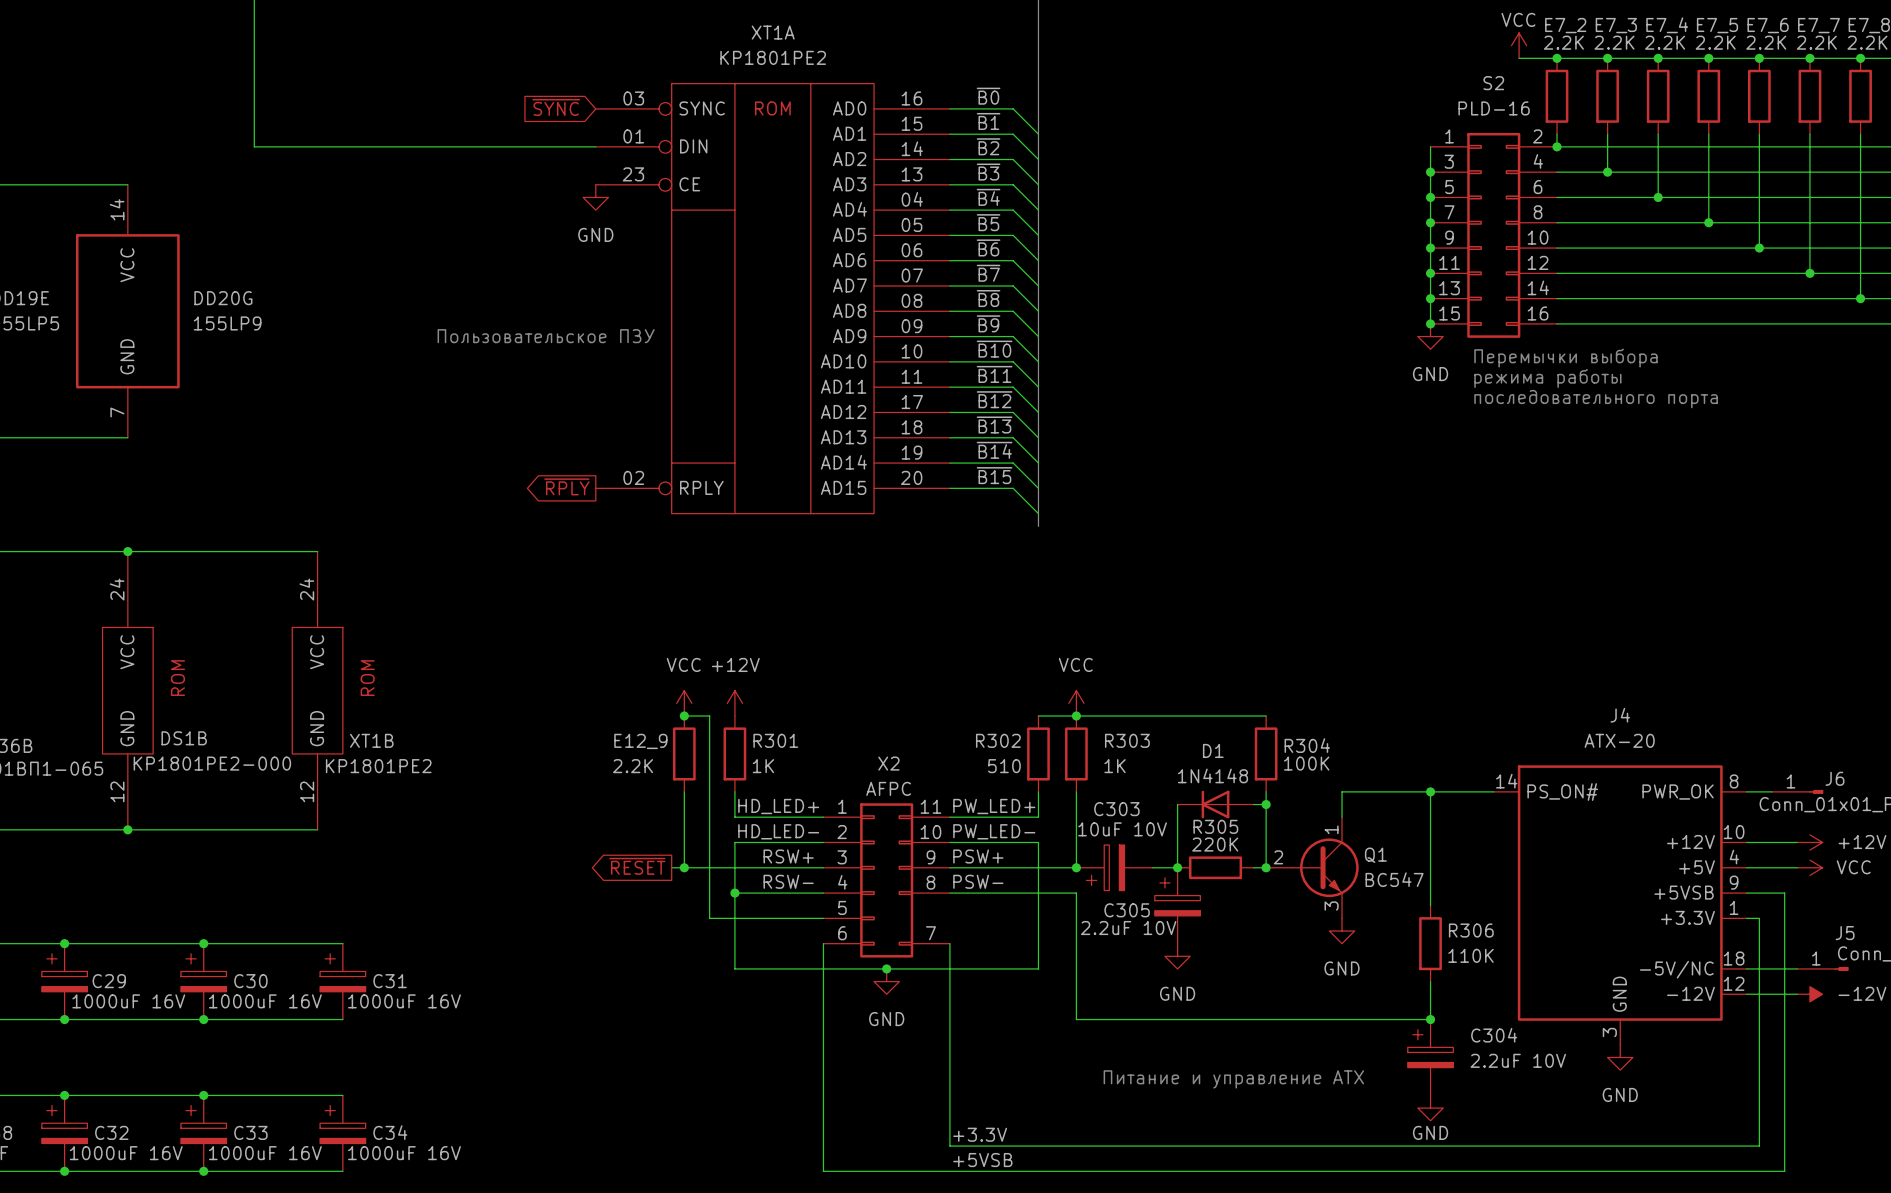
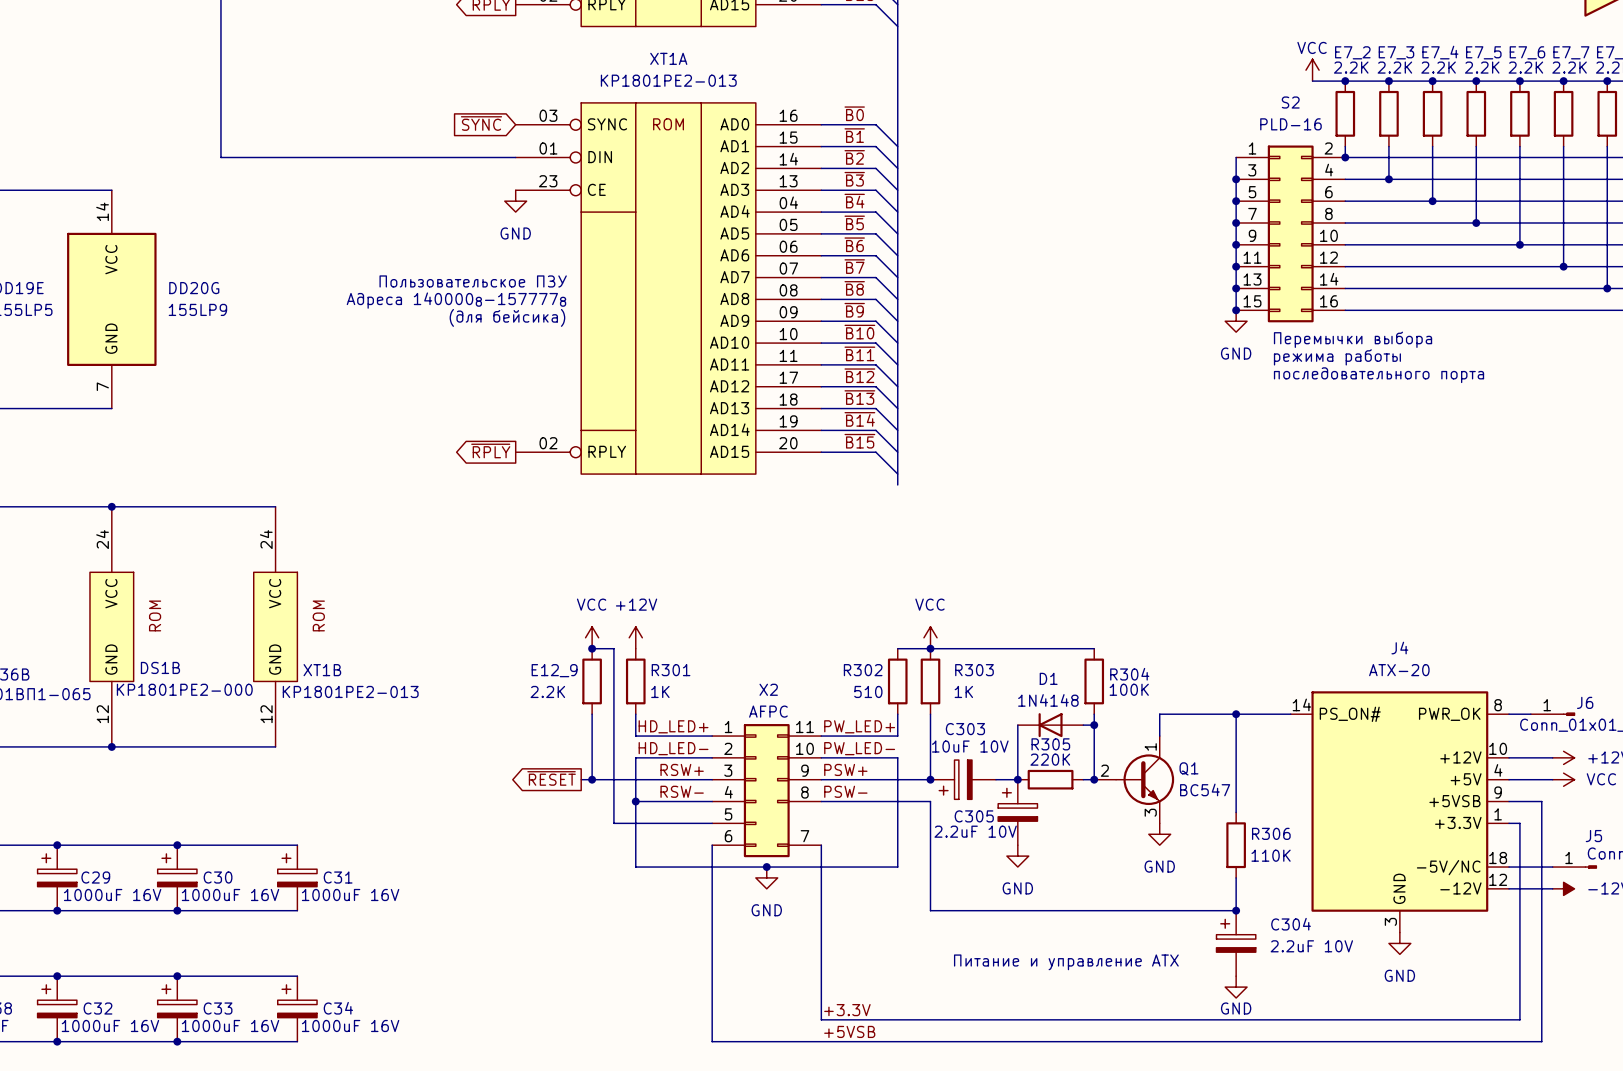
XT1A value: КР1801РЕ2 (773, 57) -> КР1801РЕ2-013 (668, 80)
text: none -> Адреса 1400008-1577778 (456, 300)
text: none -> (для бейсика) (507, 317)
text position: Пользовательское ПЗУ (546, 336) -> Пользовательское ПЗУ (473, 281)
XT1B value: КР1801РЕ2 (378, 766) -> КР1801РЕ2-013 (350, 691)

